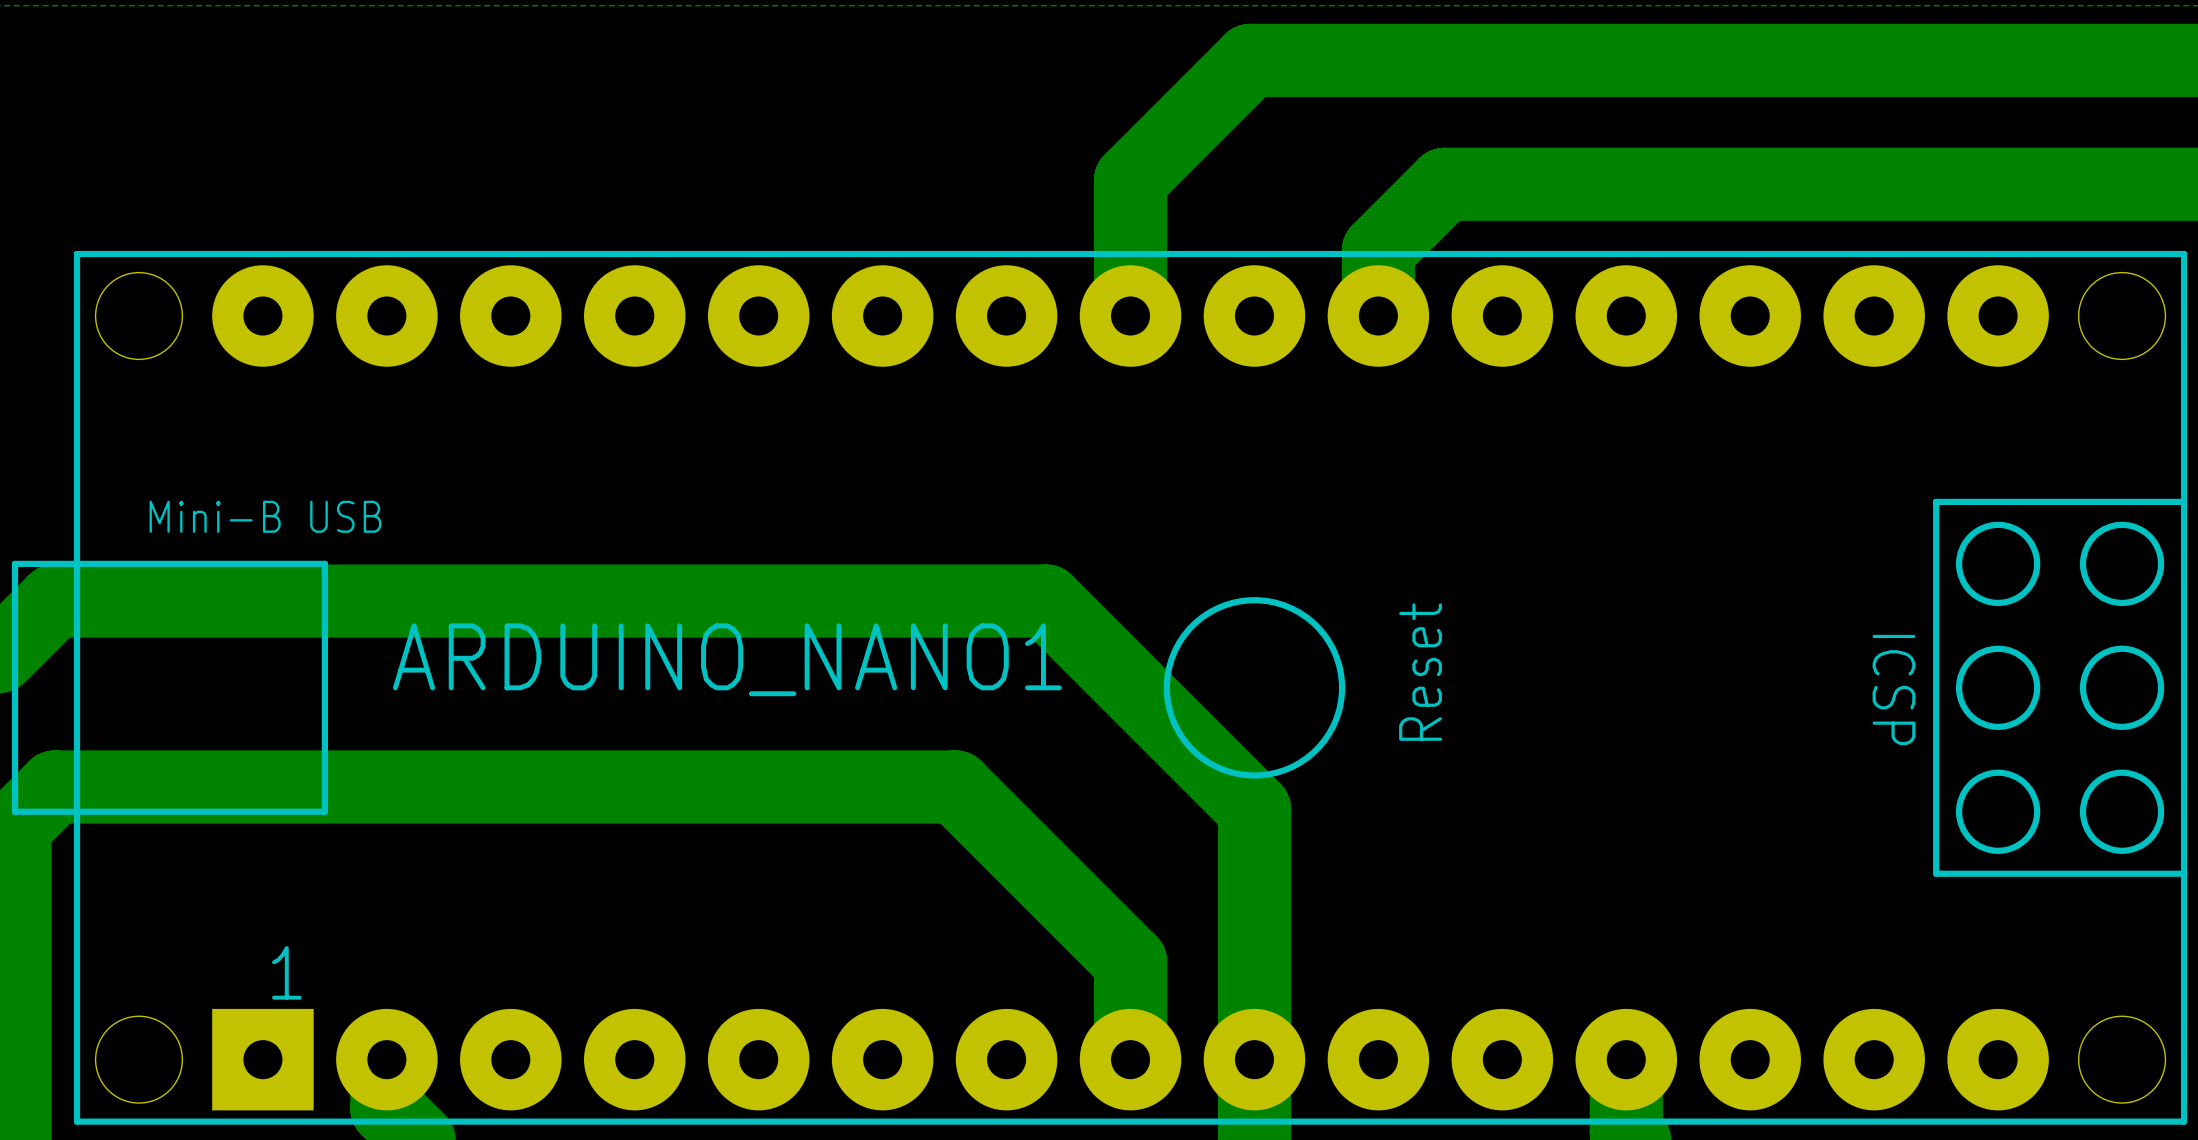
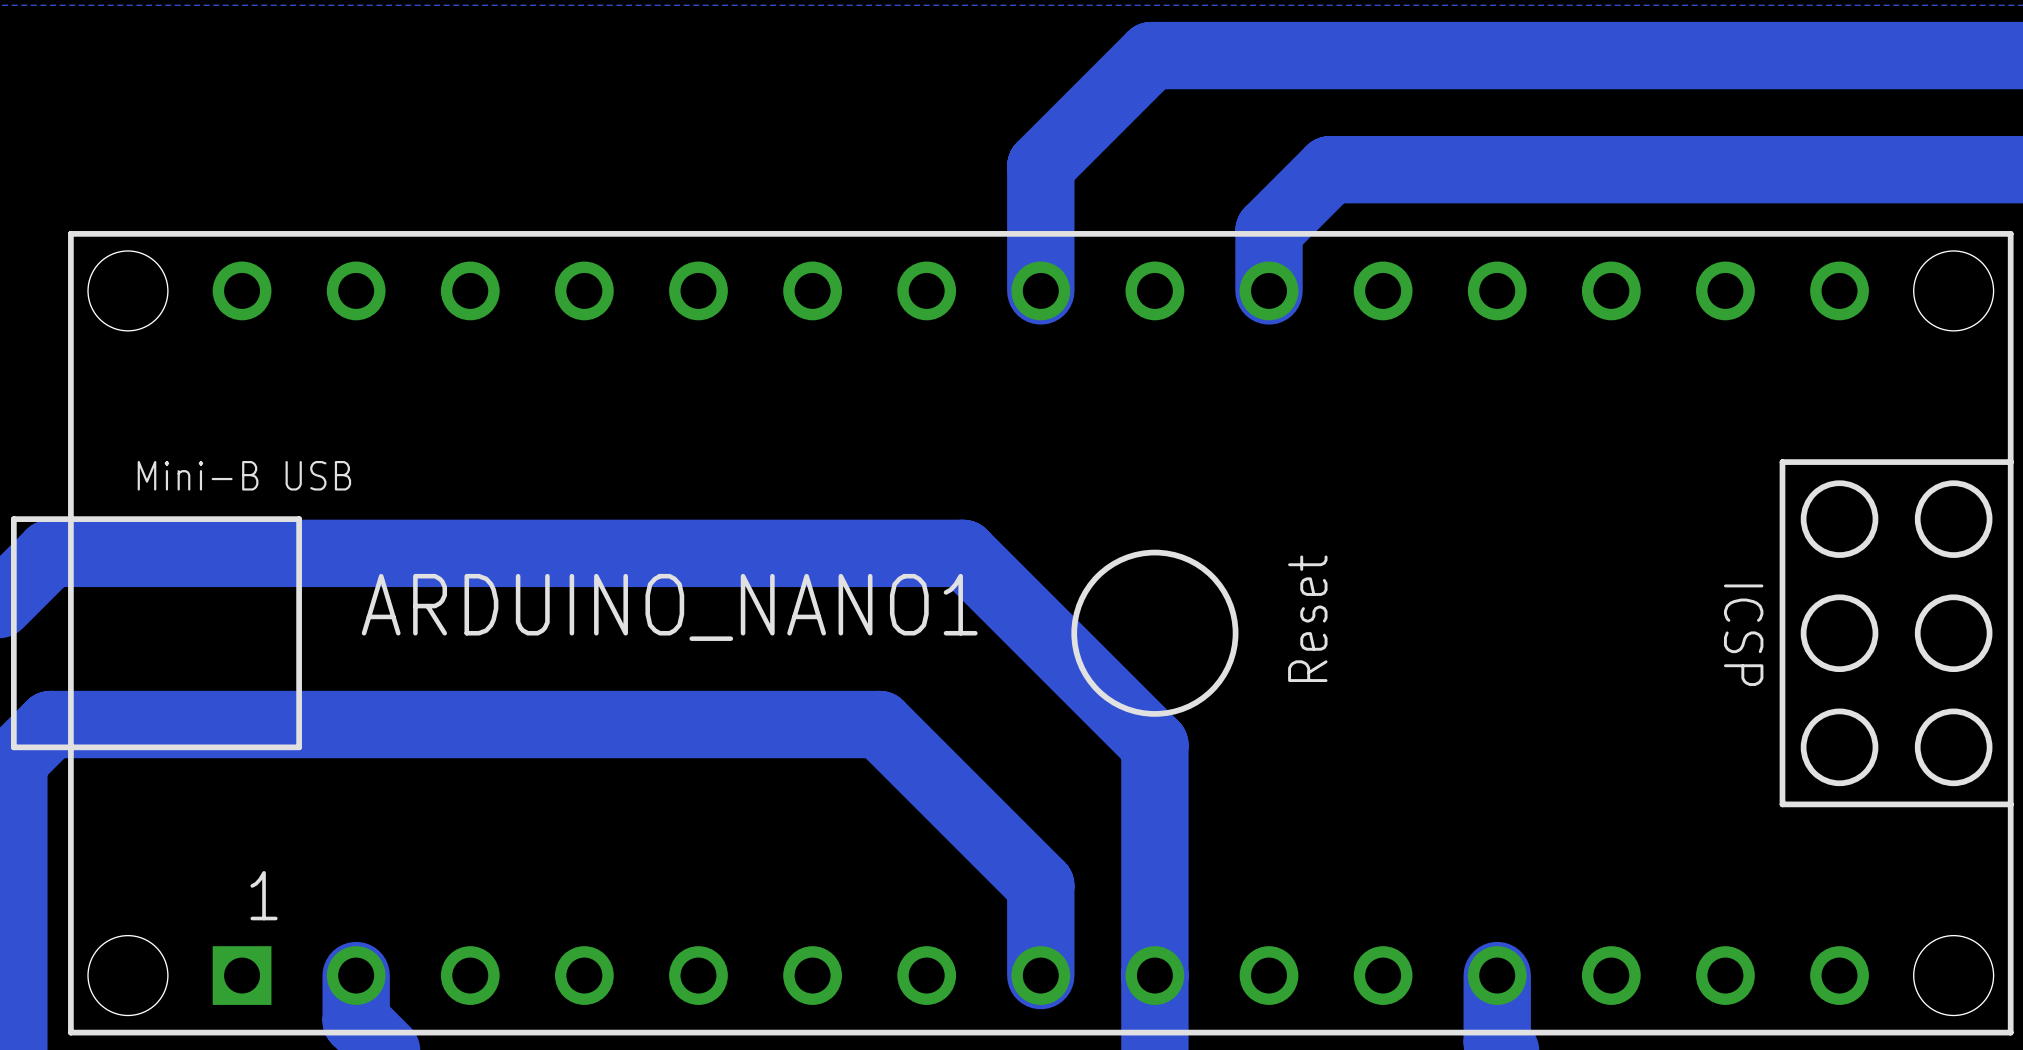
ARDUINO_NANO1 footprint: [11, 250, 2188, 1125] -> [10, 231, 2014, 1036]

